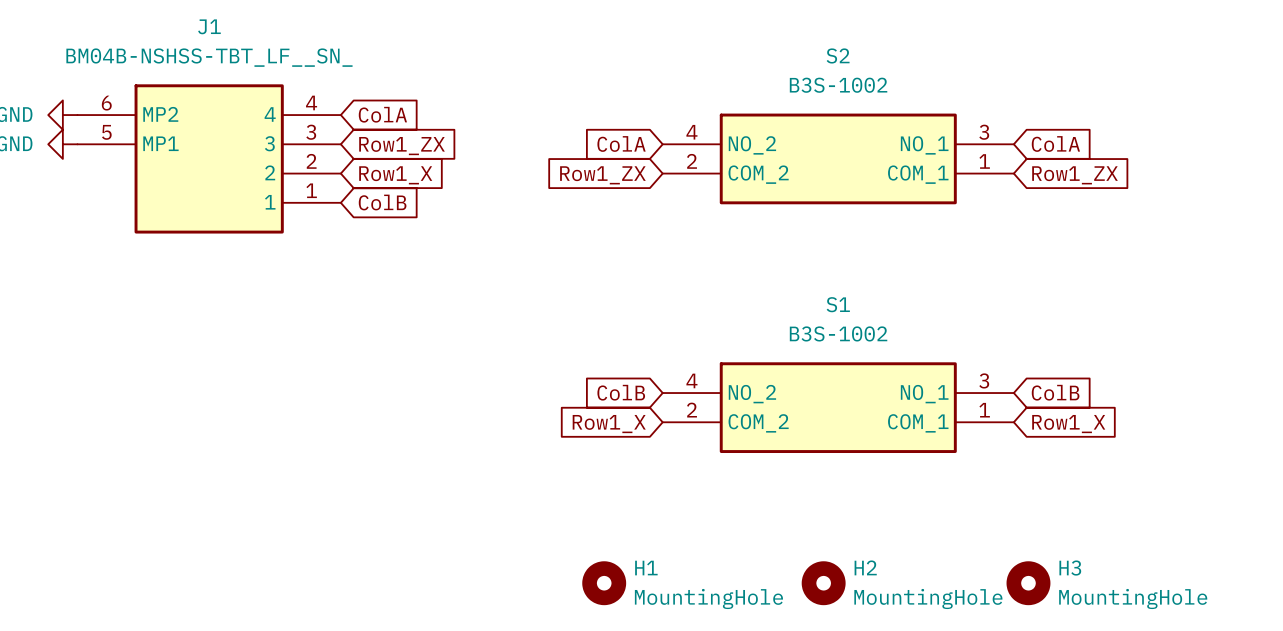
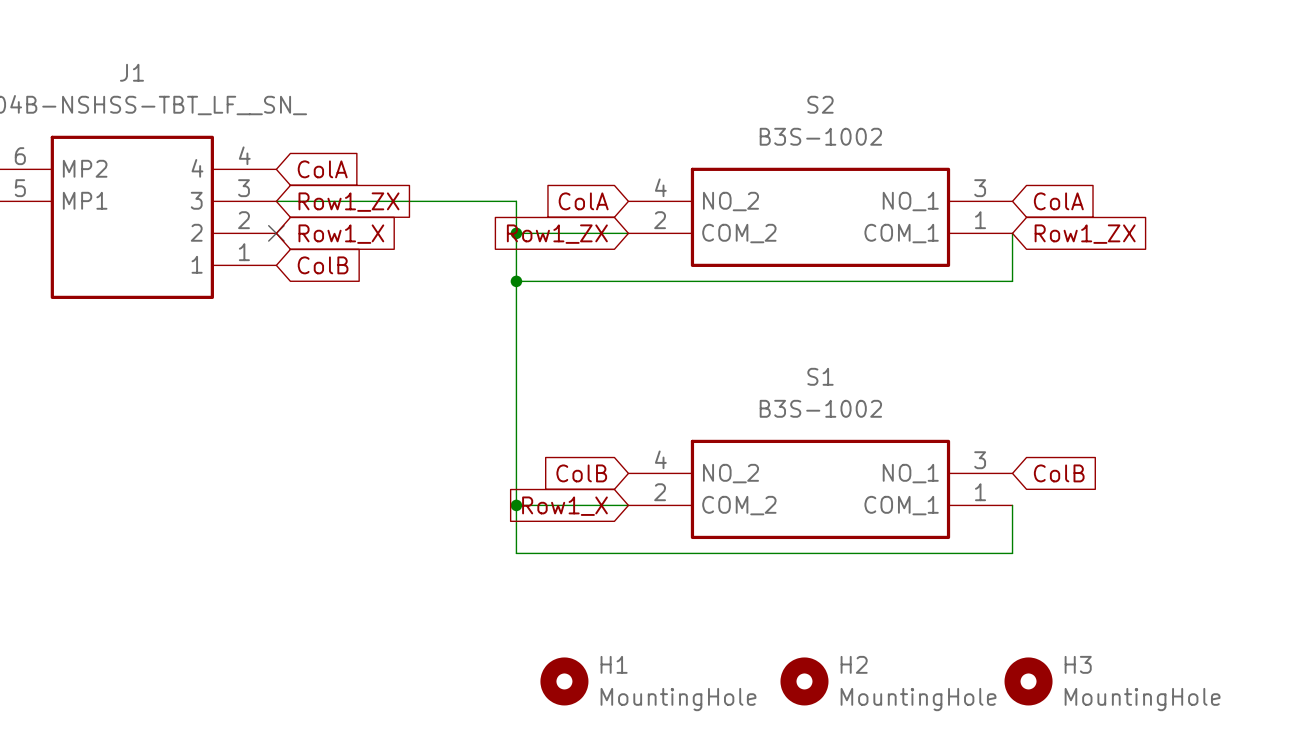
wire: none -> (276, 201) (516, 201) (516, 553) (1012, 553) (1012, 505)
no-connect mark: none -> (276, 233)
wire: none -> (516, 233) (628, 233)
junction: none -> (516, 233)
wire: none -> (1012, 233) (1012, 281) (516, 281)
junction: none -> (516, 281)
wire: none -> (516, 505) (628, 505)
junction: none -> (516, 505)
global label: Row1_X (1068, 424) -> none

